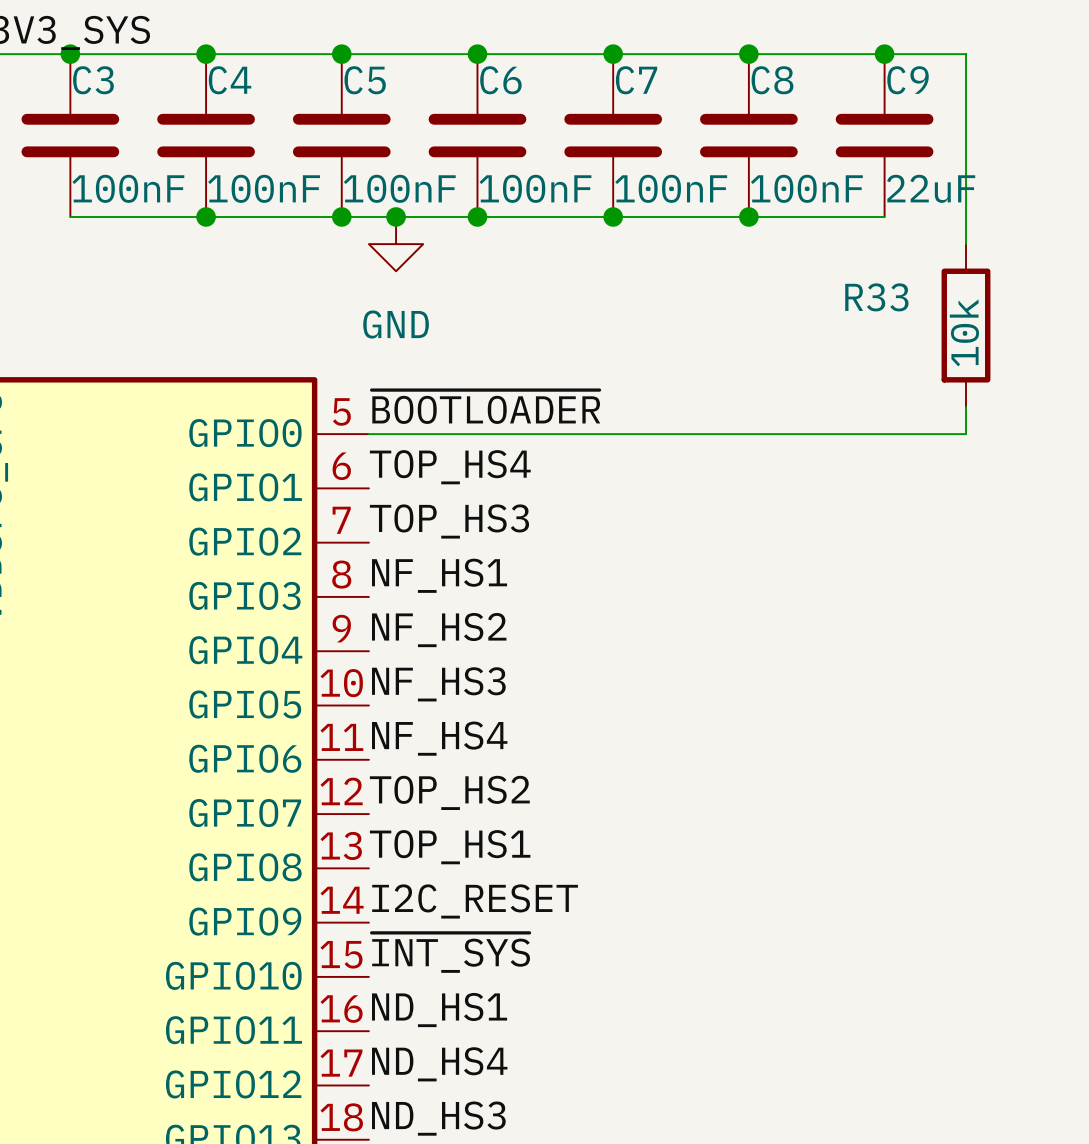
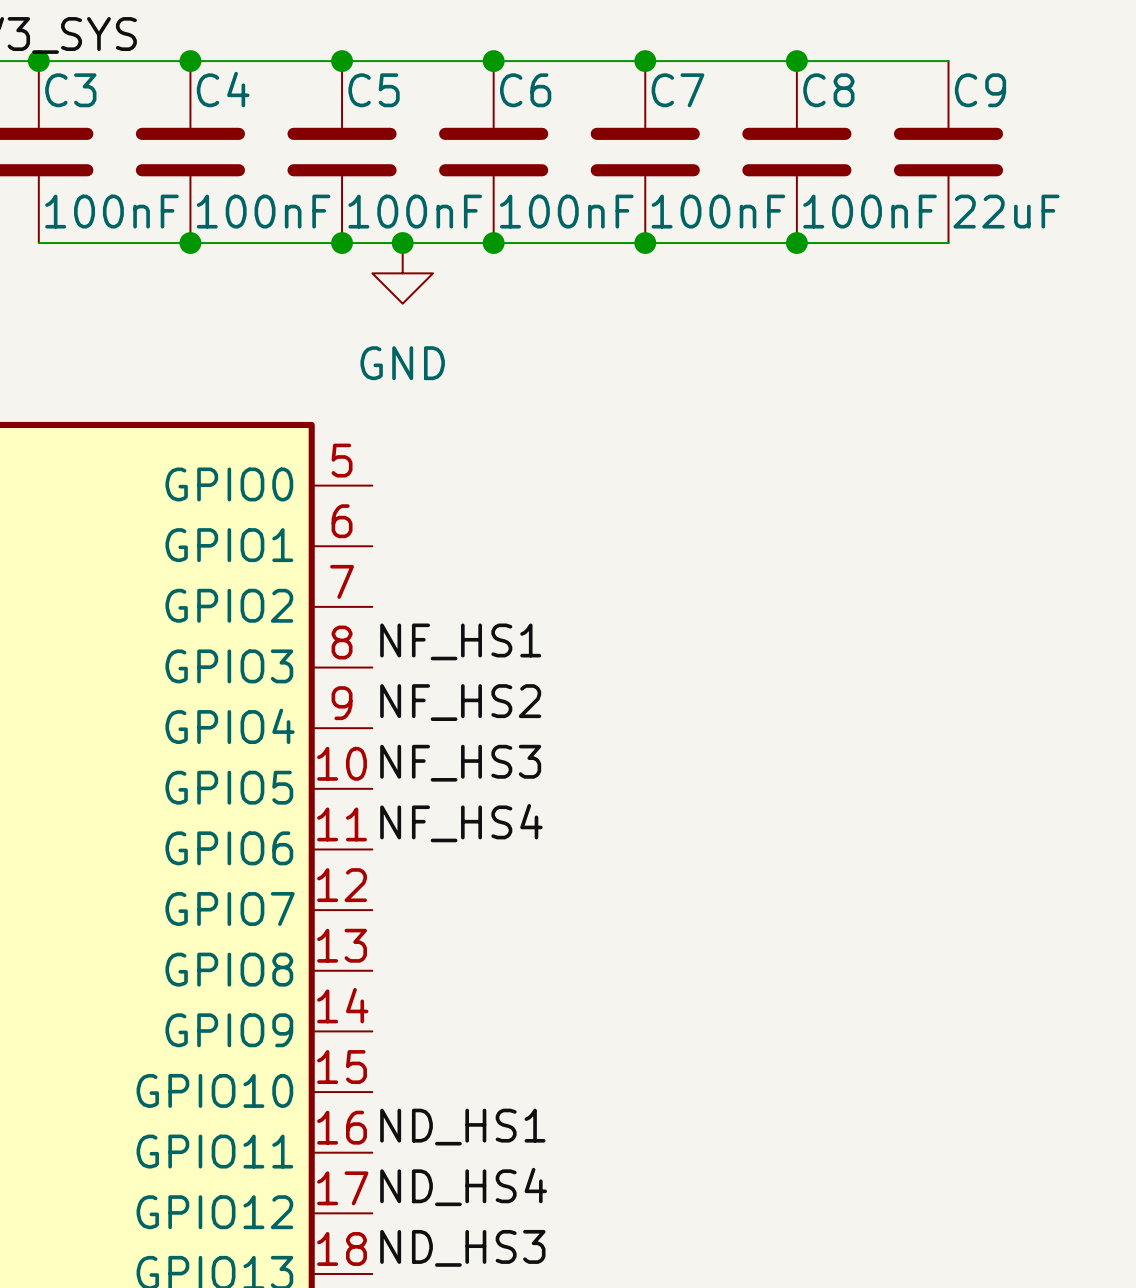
wire: (884, 54) (966, 54) (966, 244) -> none
junction: (884, 54) -> none
R33: 10k (966, 325) -> none
label: ~{BOOTLOADER} (485, 406) -> none
wire: (966, 406) (966, 434) (368, 434) -> none
label: TOP_HS4 (450, 467) -> none
label: TOP_HS3 (449, 521) -> none
label: TOP_HS2 (449, 792) -> none
label: TOP_HS1 (450, 847) -> none
label: I2C_RESET (475, 901) -> none
label: ~{INT_SYS} (450, 952) -> none

